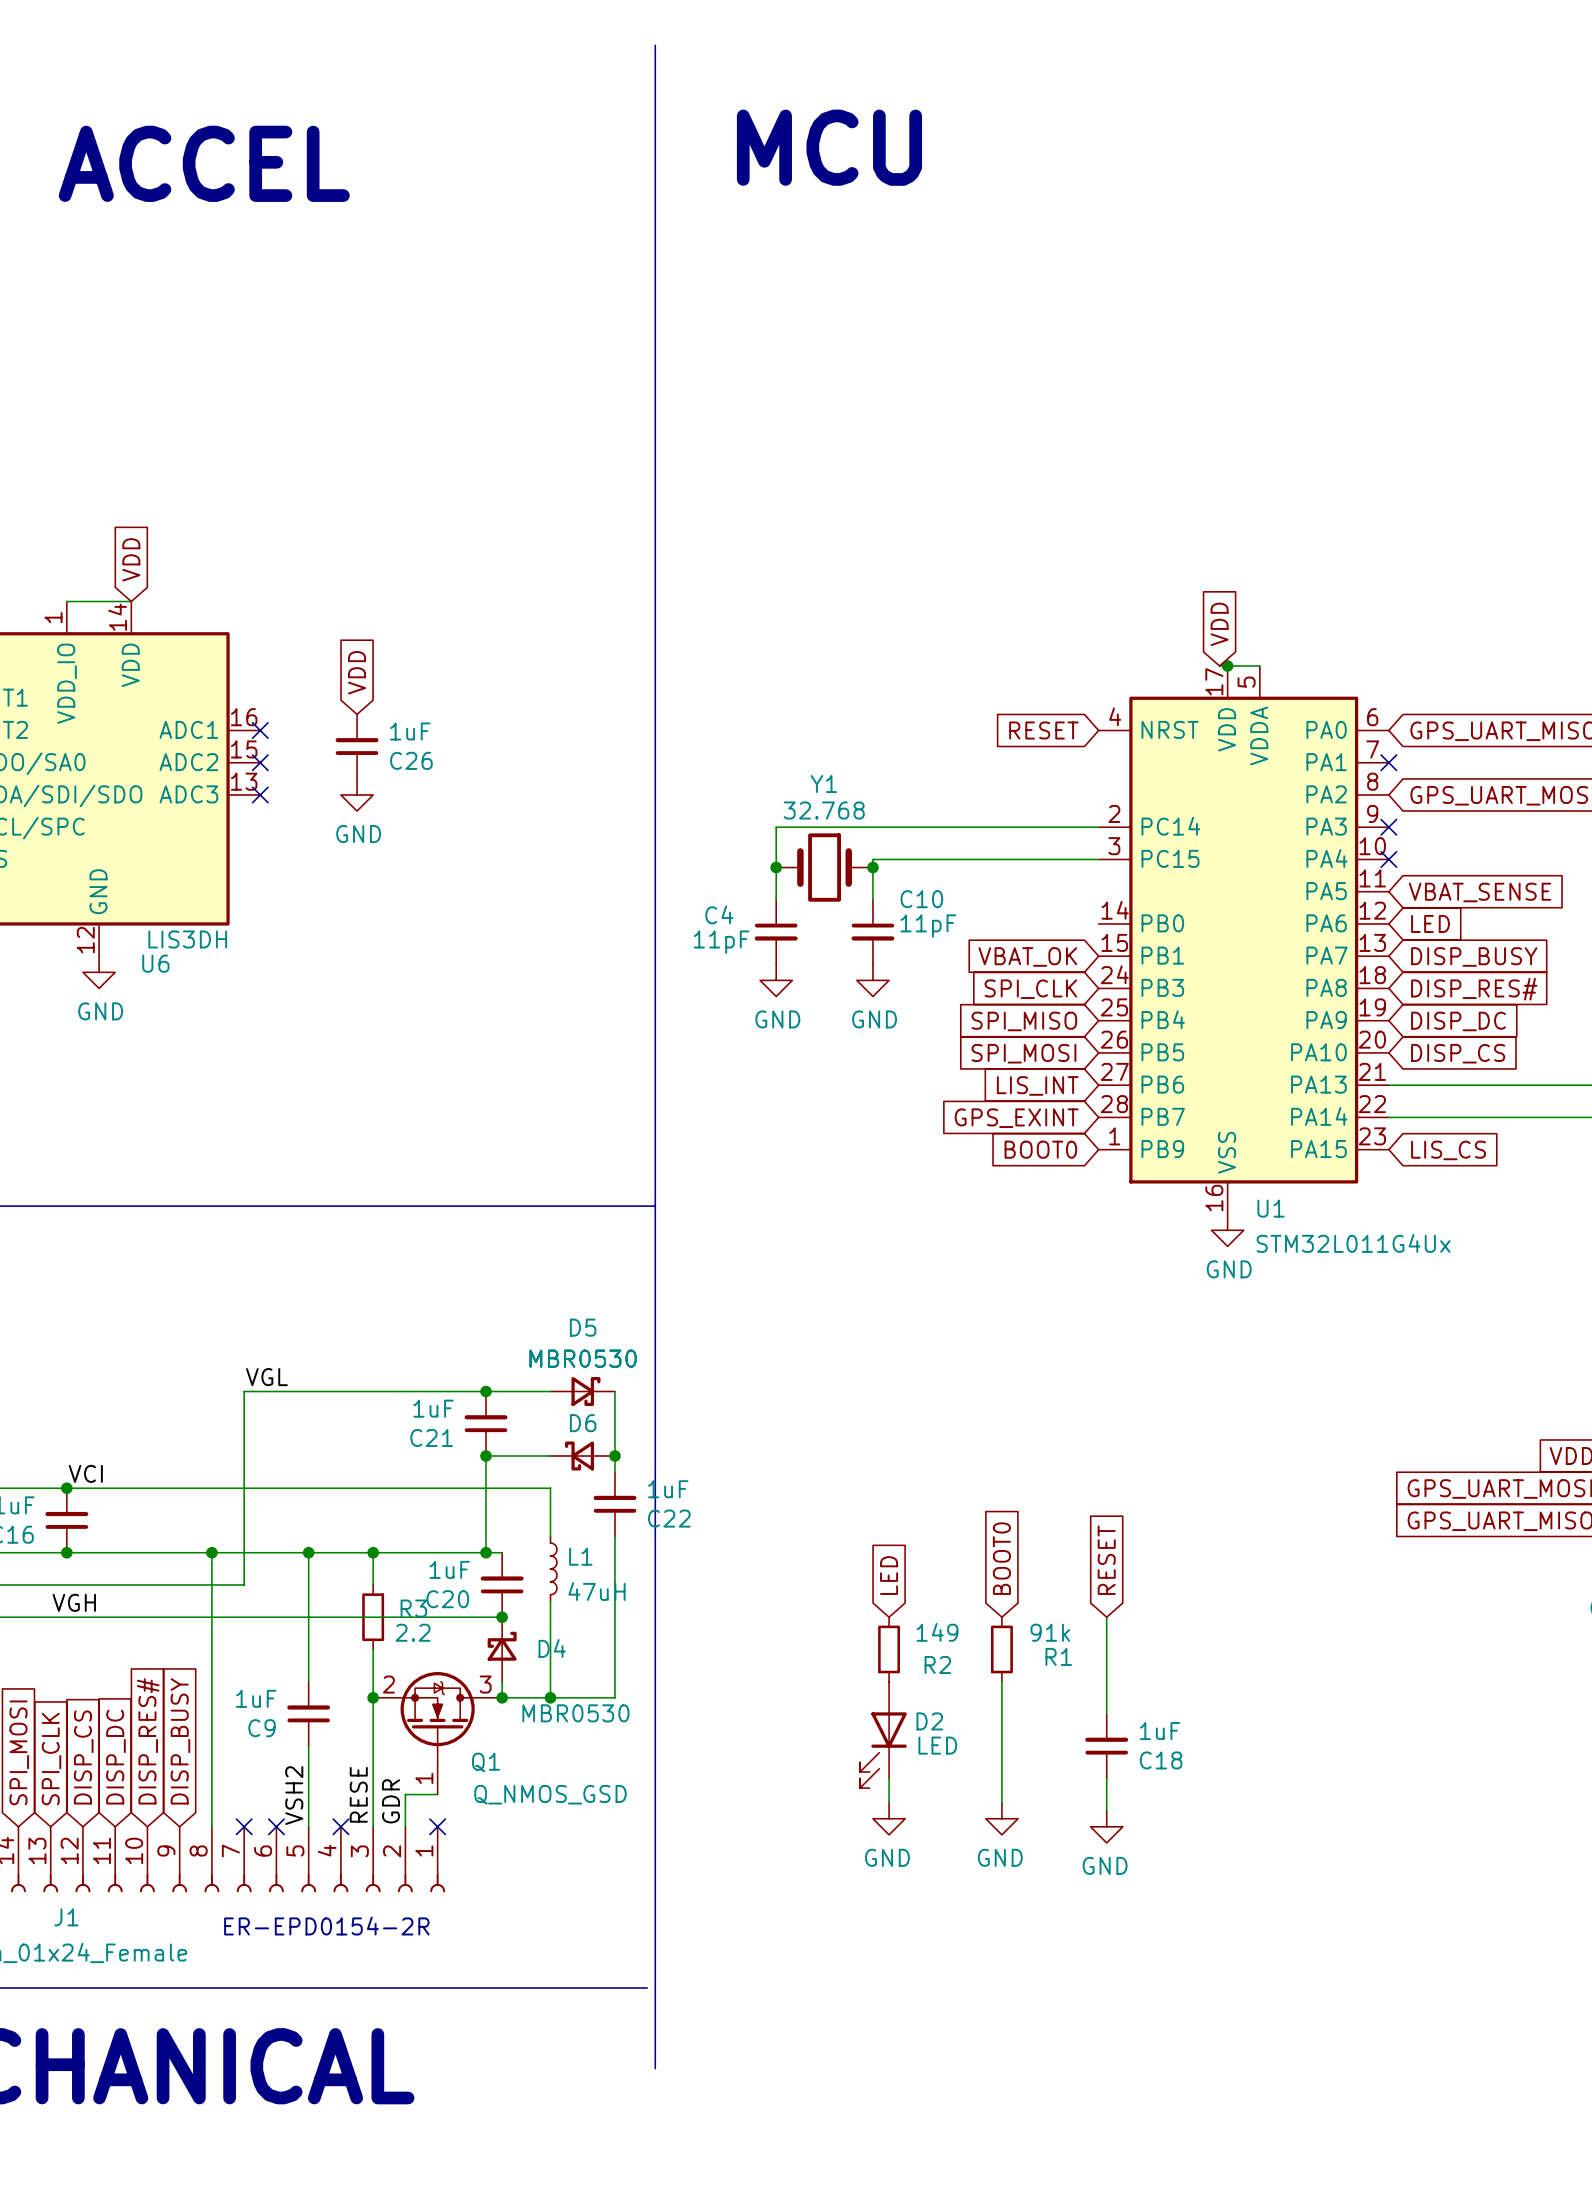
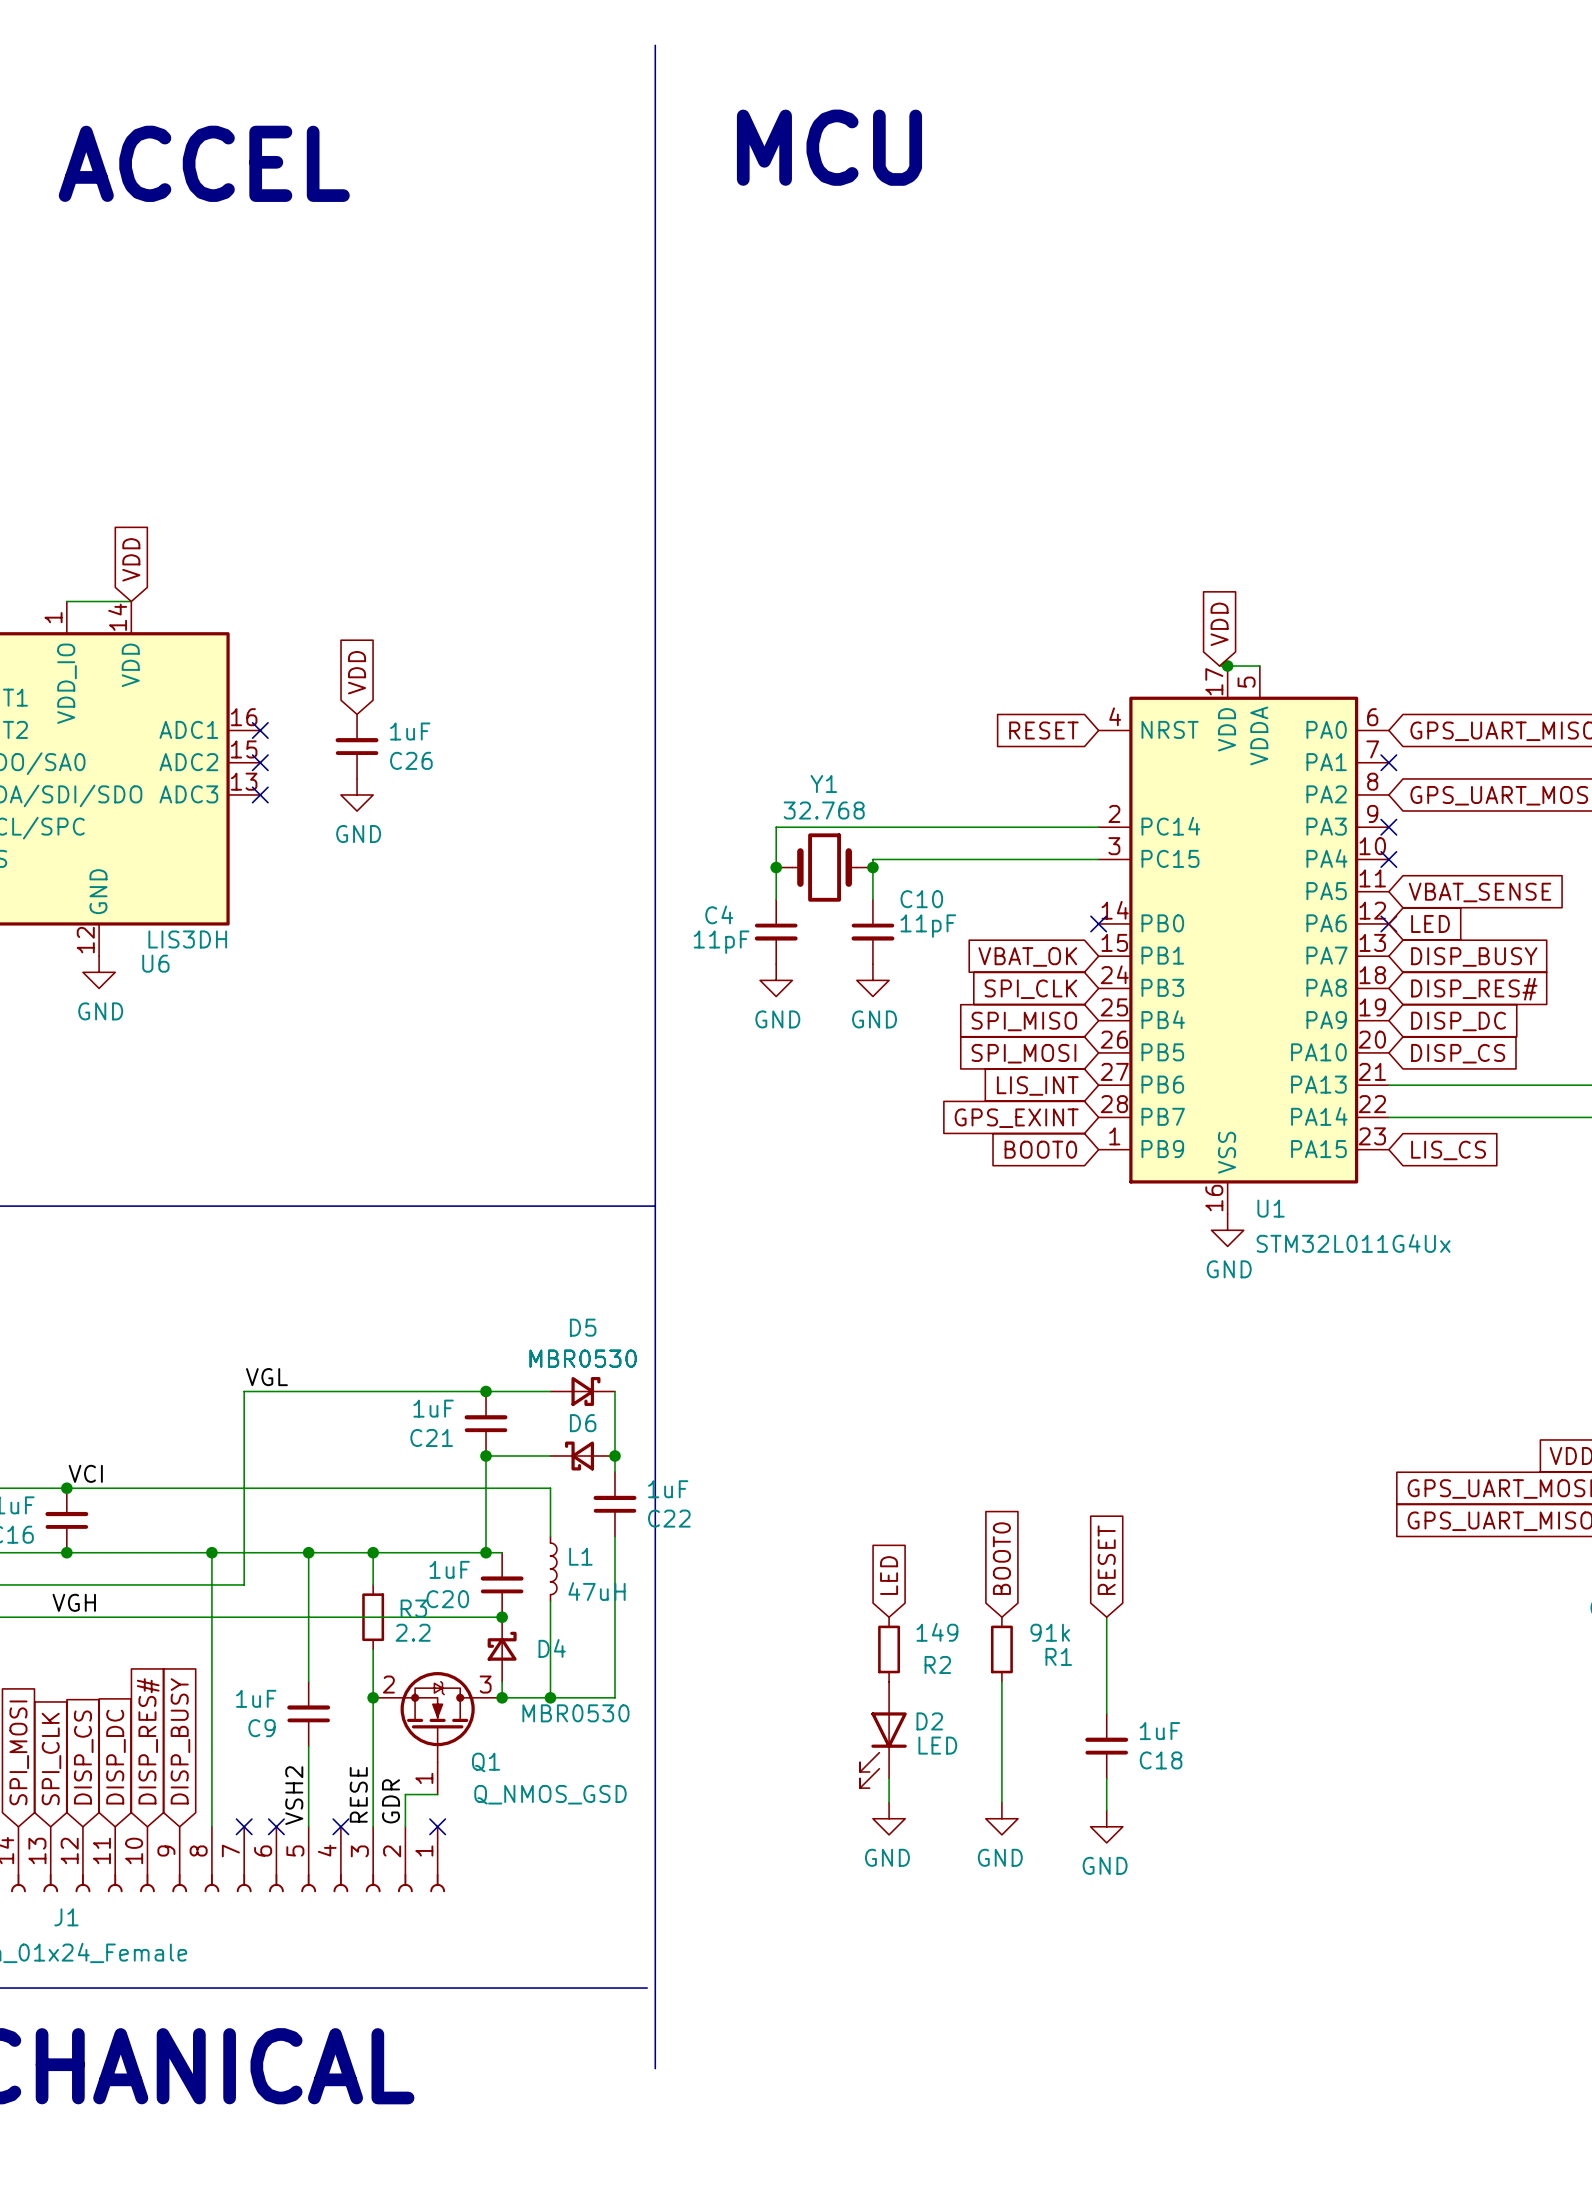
no-connect mark: none -> (1098, 923)
no-connect mark: none -> (1388, 923)
text: ER-EPD0154-2R (326, 1926) -> none

